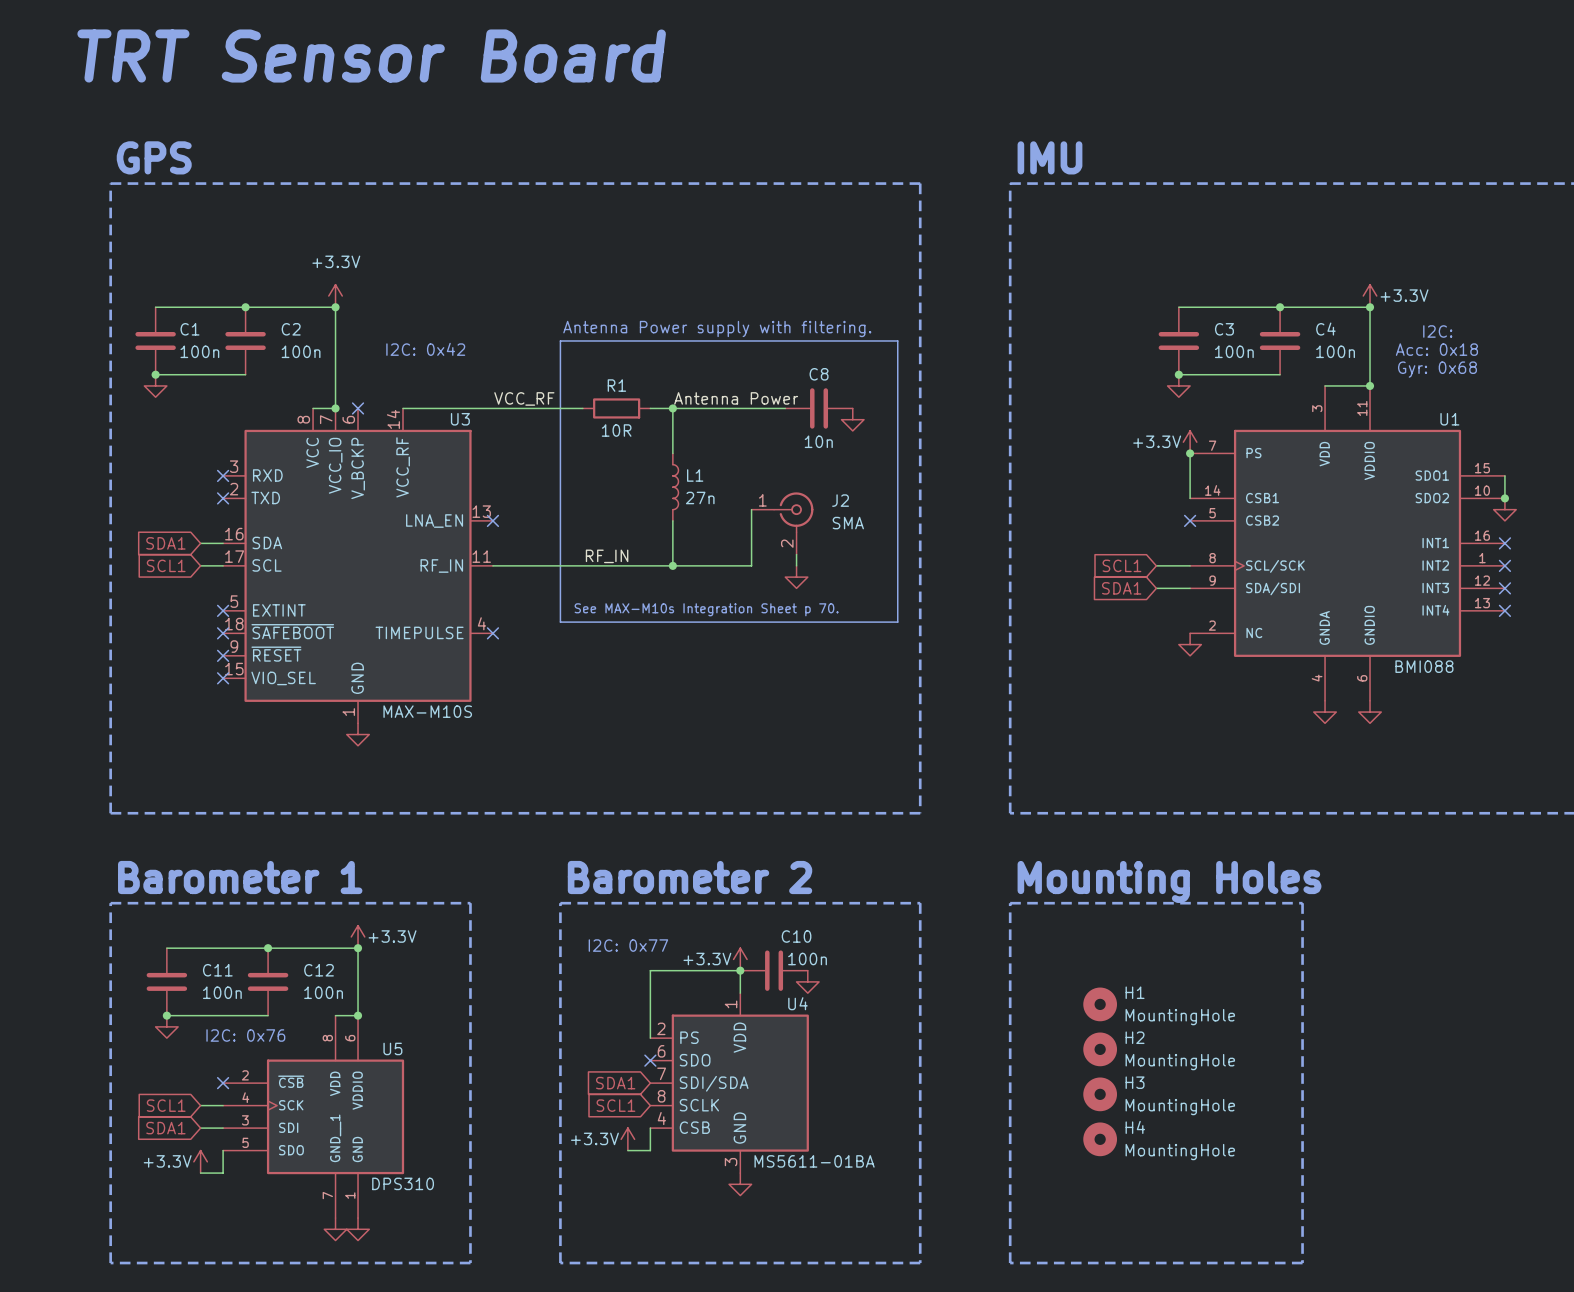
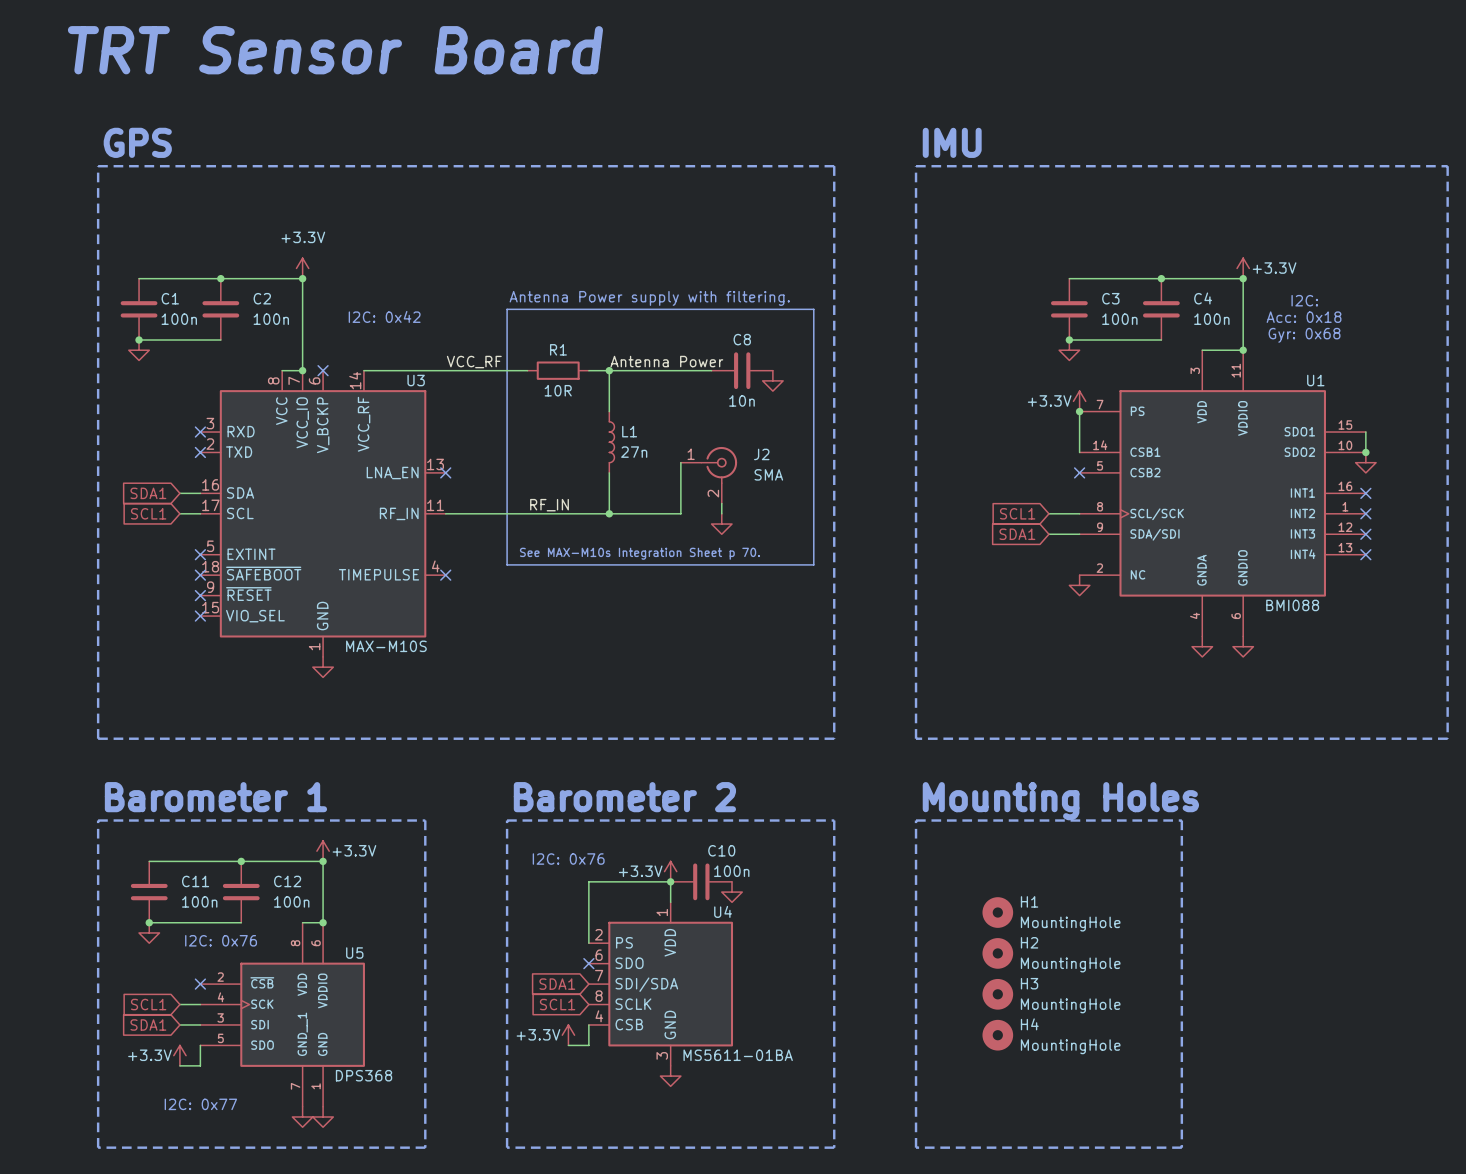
text: I2C: 0x77 (628, 945) -> I2C: 0x76 (568, 859)
U5 value: DPS310 (403, 1183) -> DPS368 (364, 1075)
text: none -> I2C: 0x77 (200, 1104)

